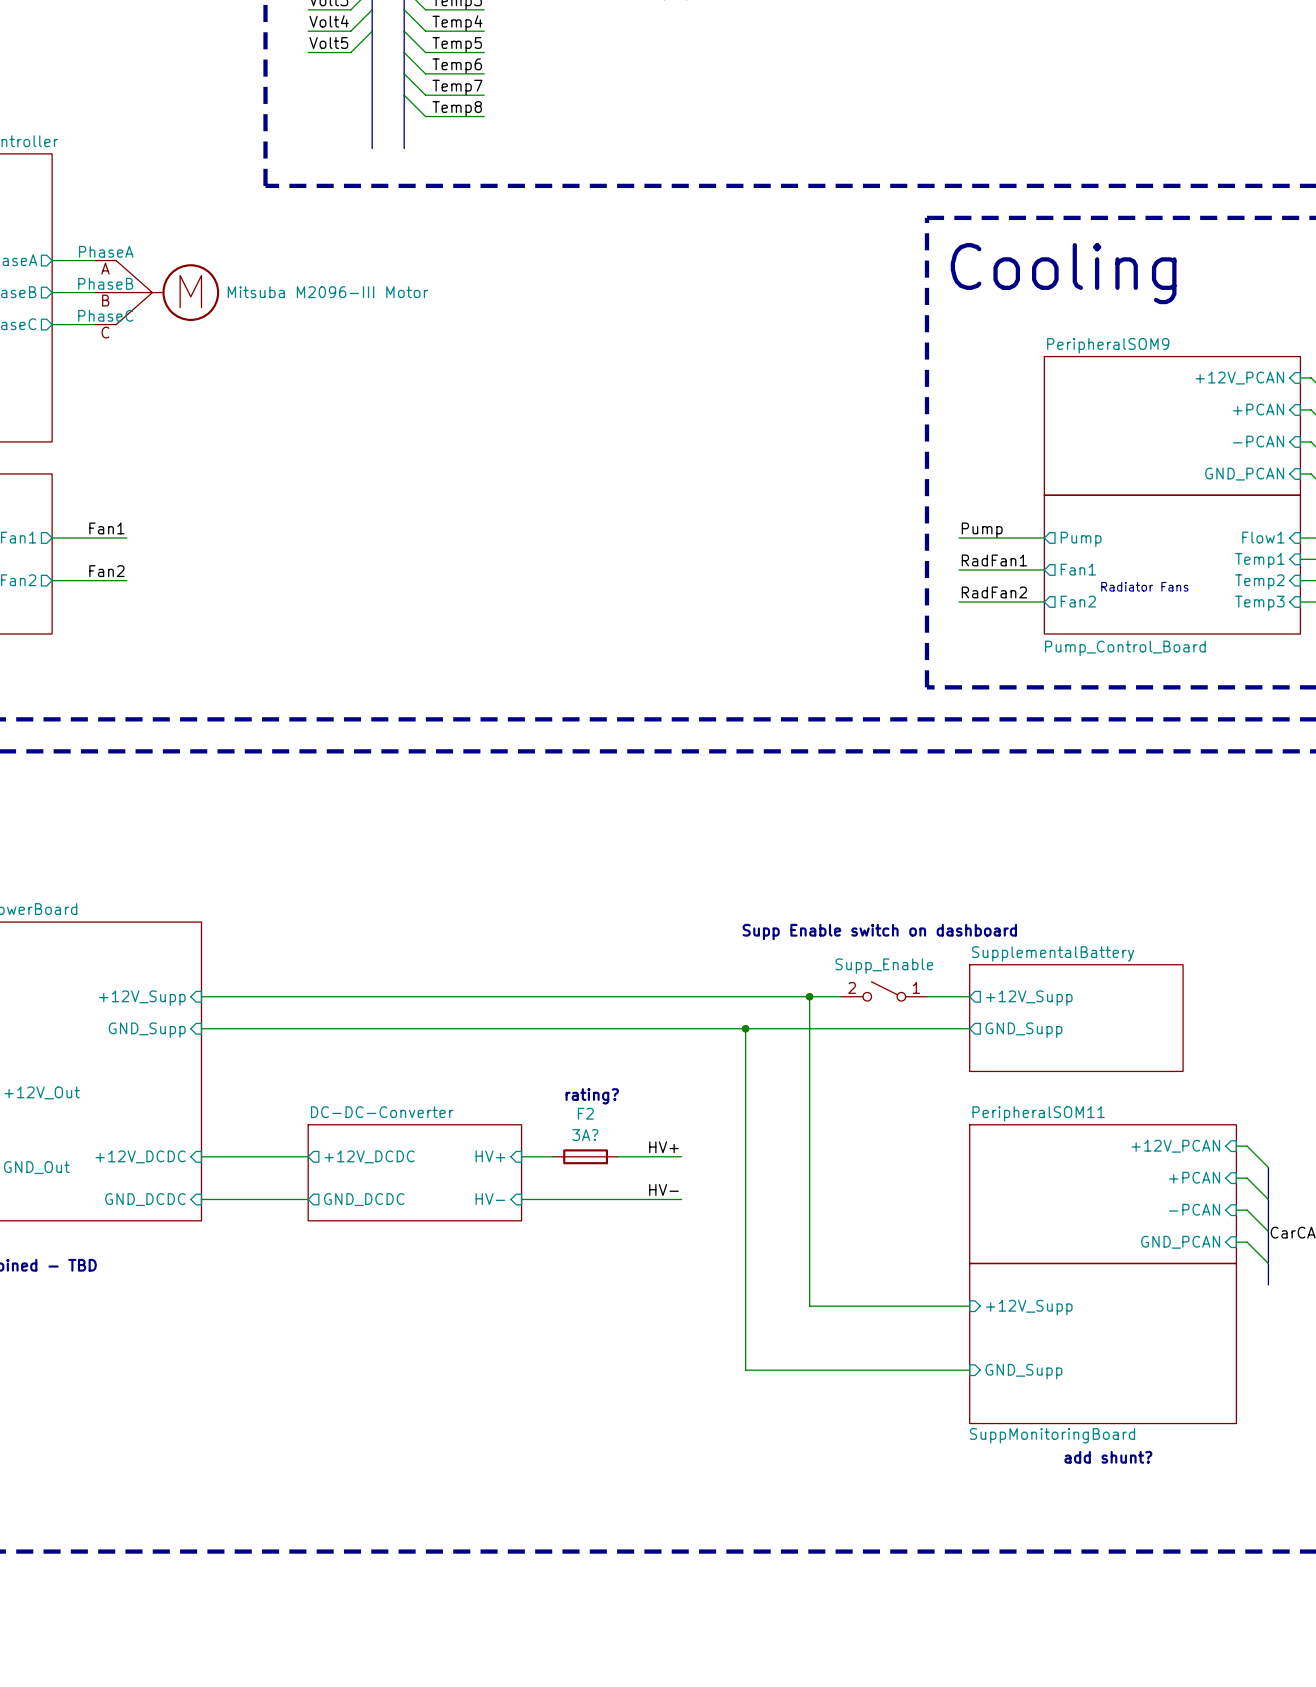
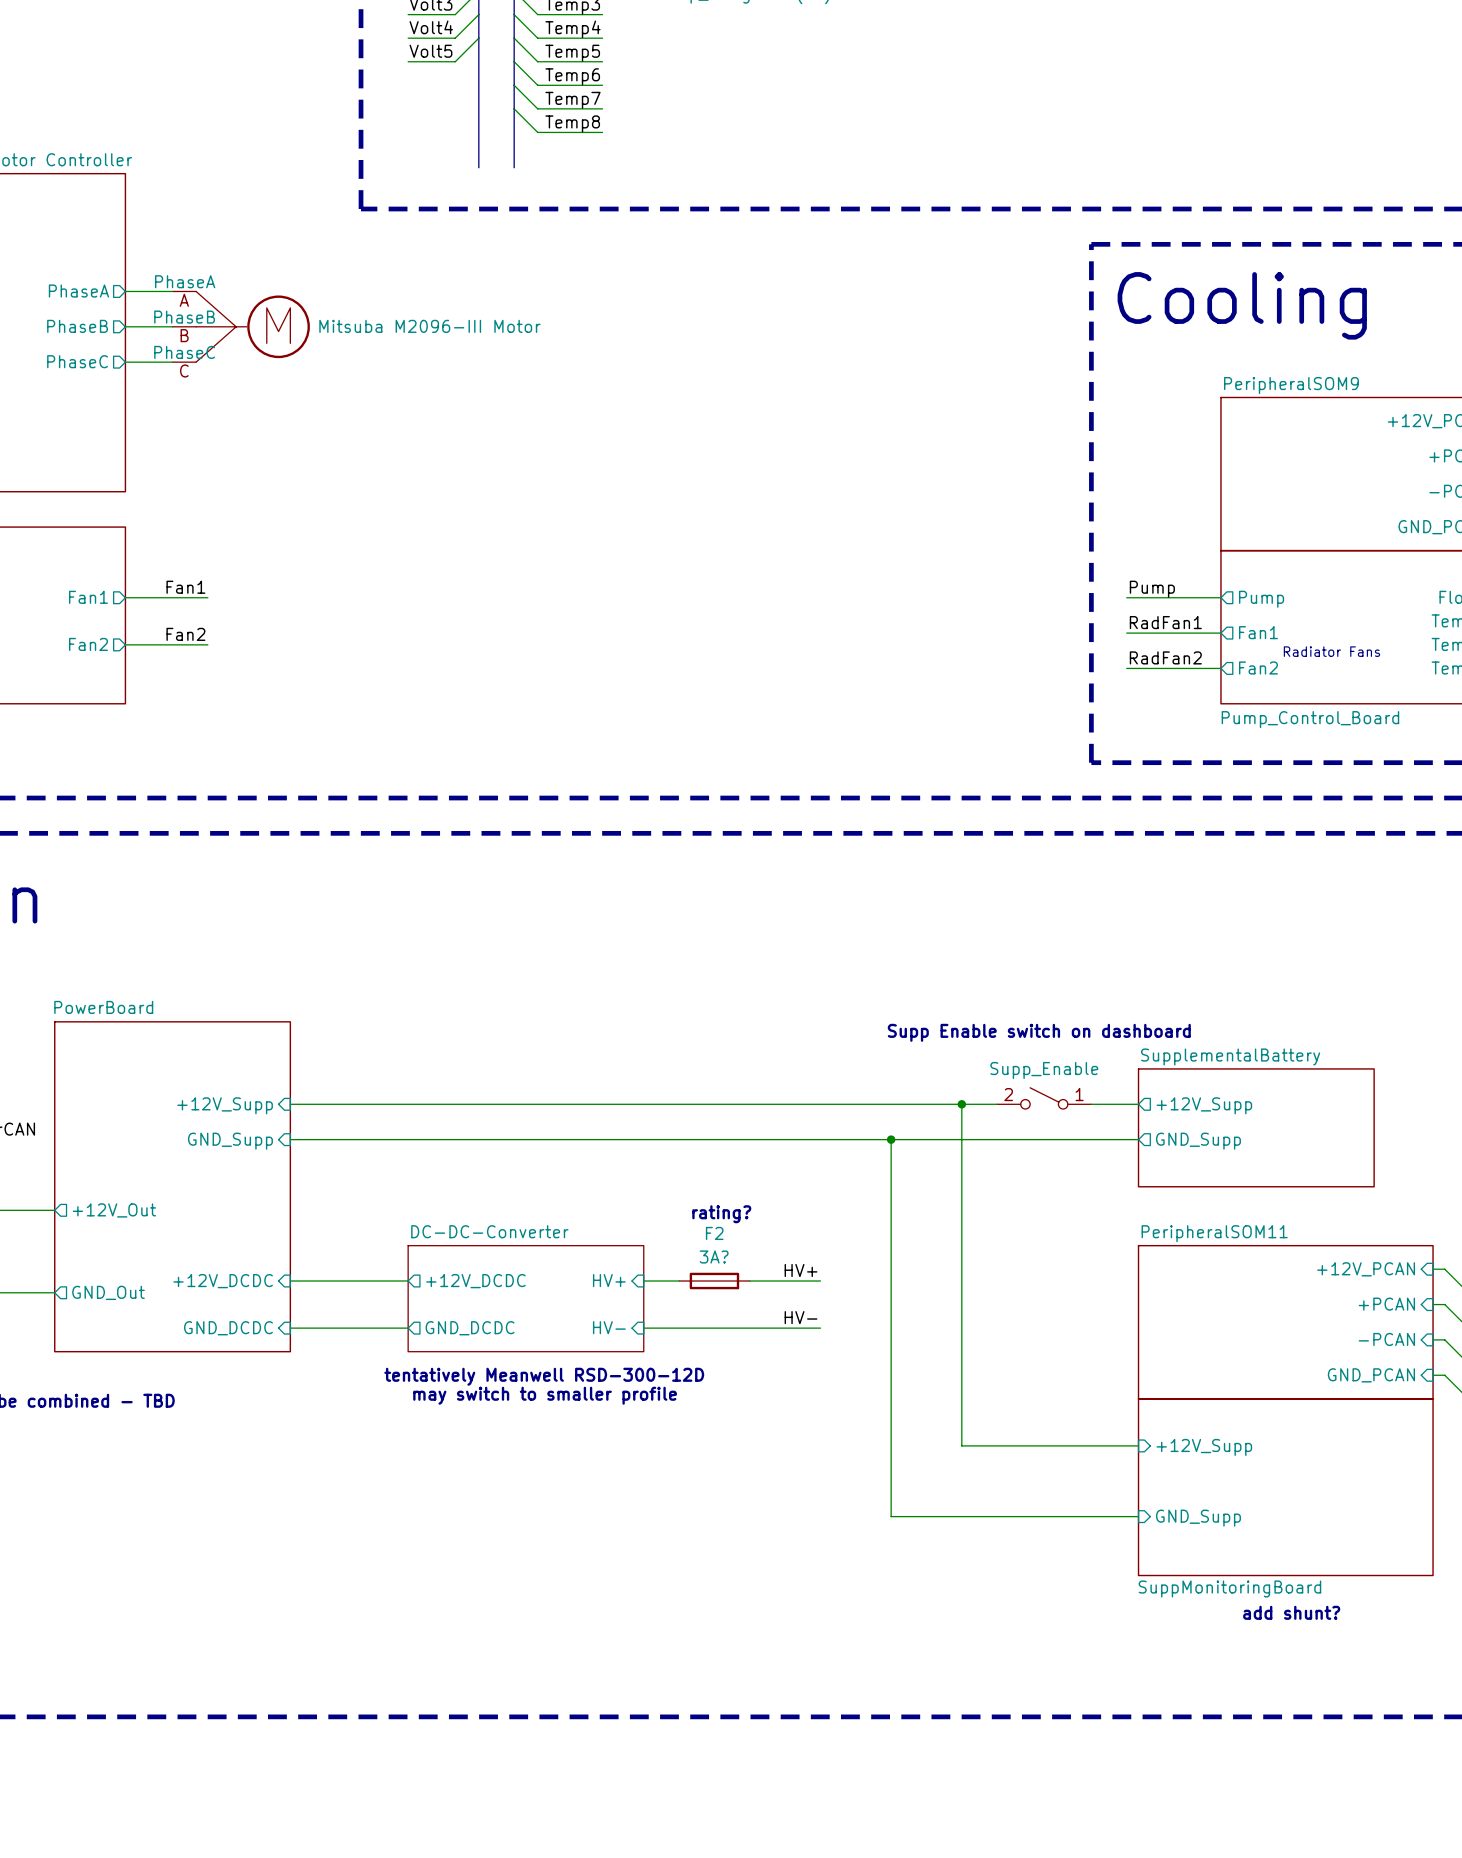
text: none -> tentatively Meanwell RSD-300-12D (544, 1376)
text: none -> may switch to smaller profile (545, 1395)

